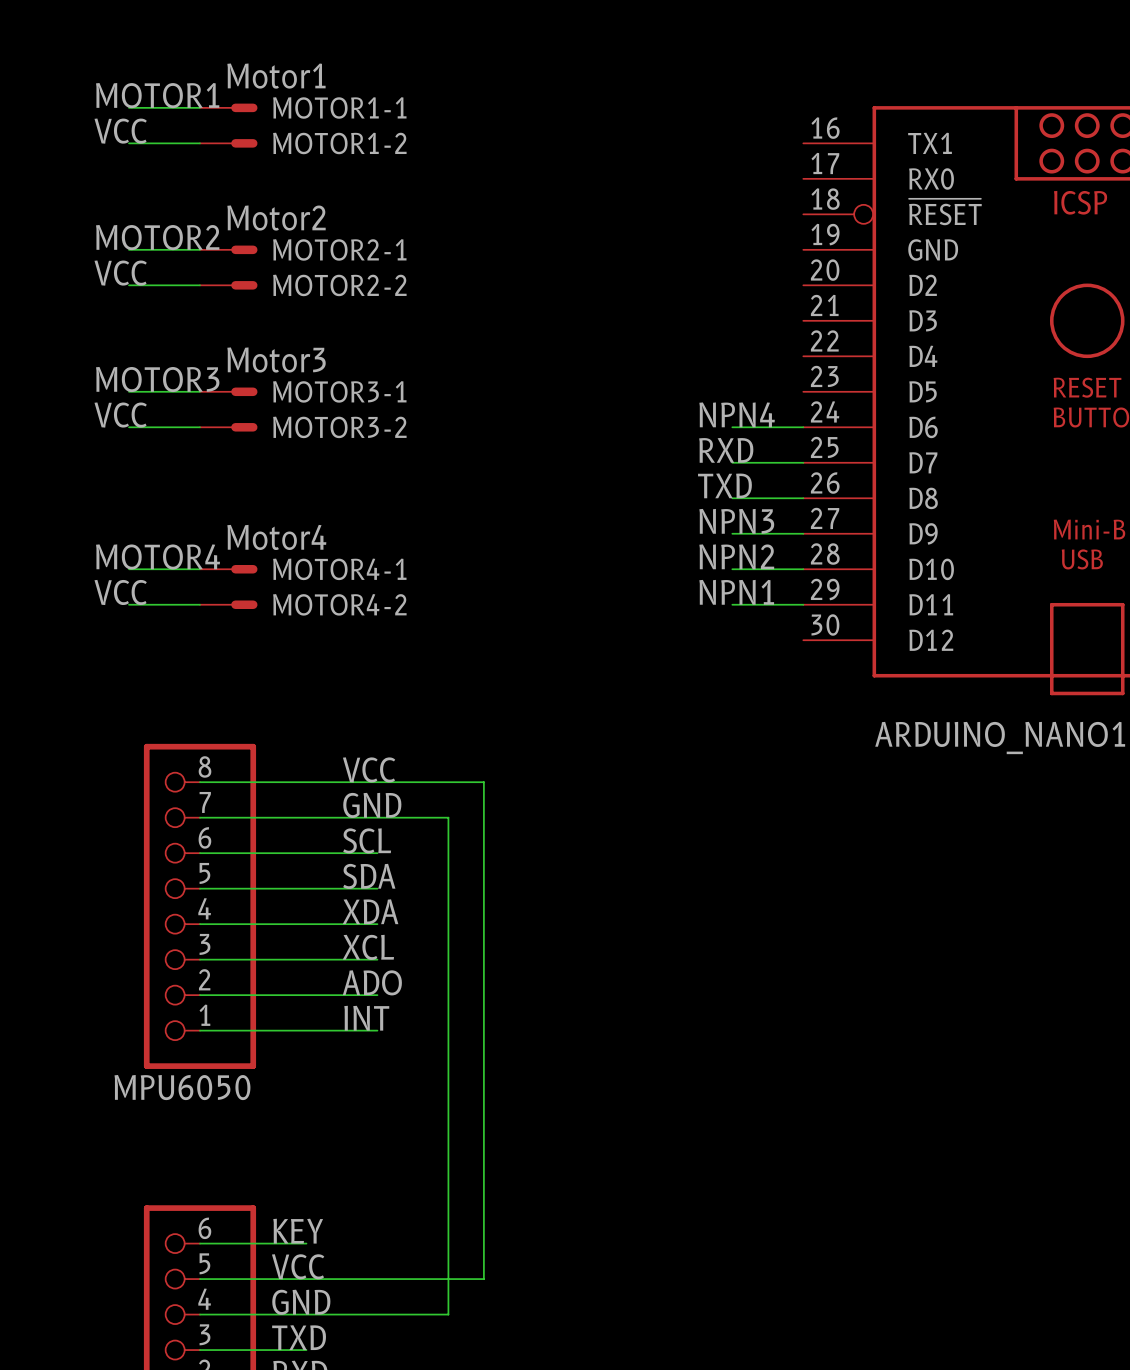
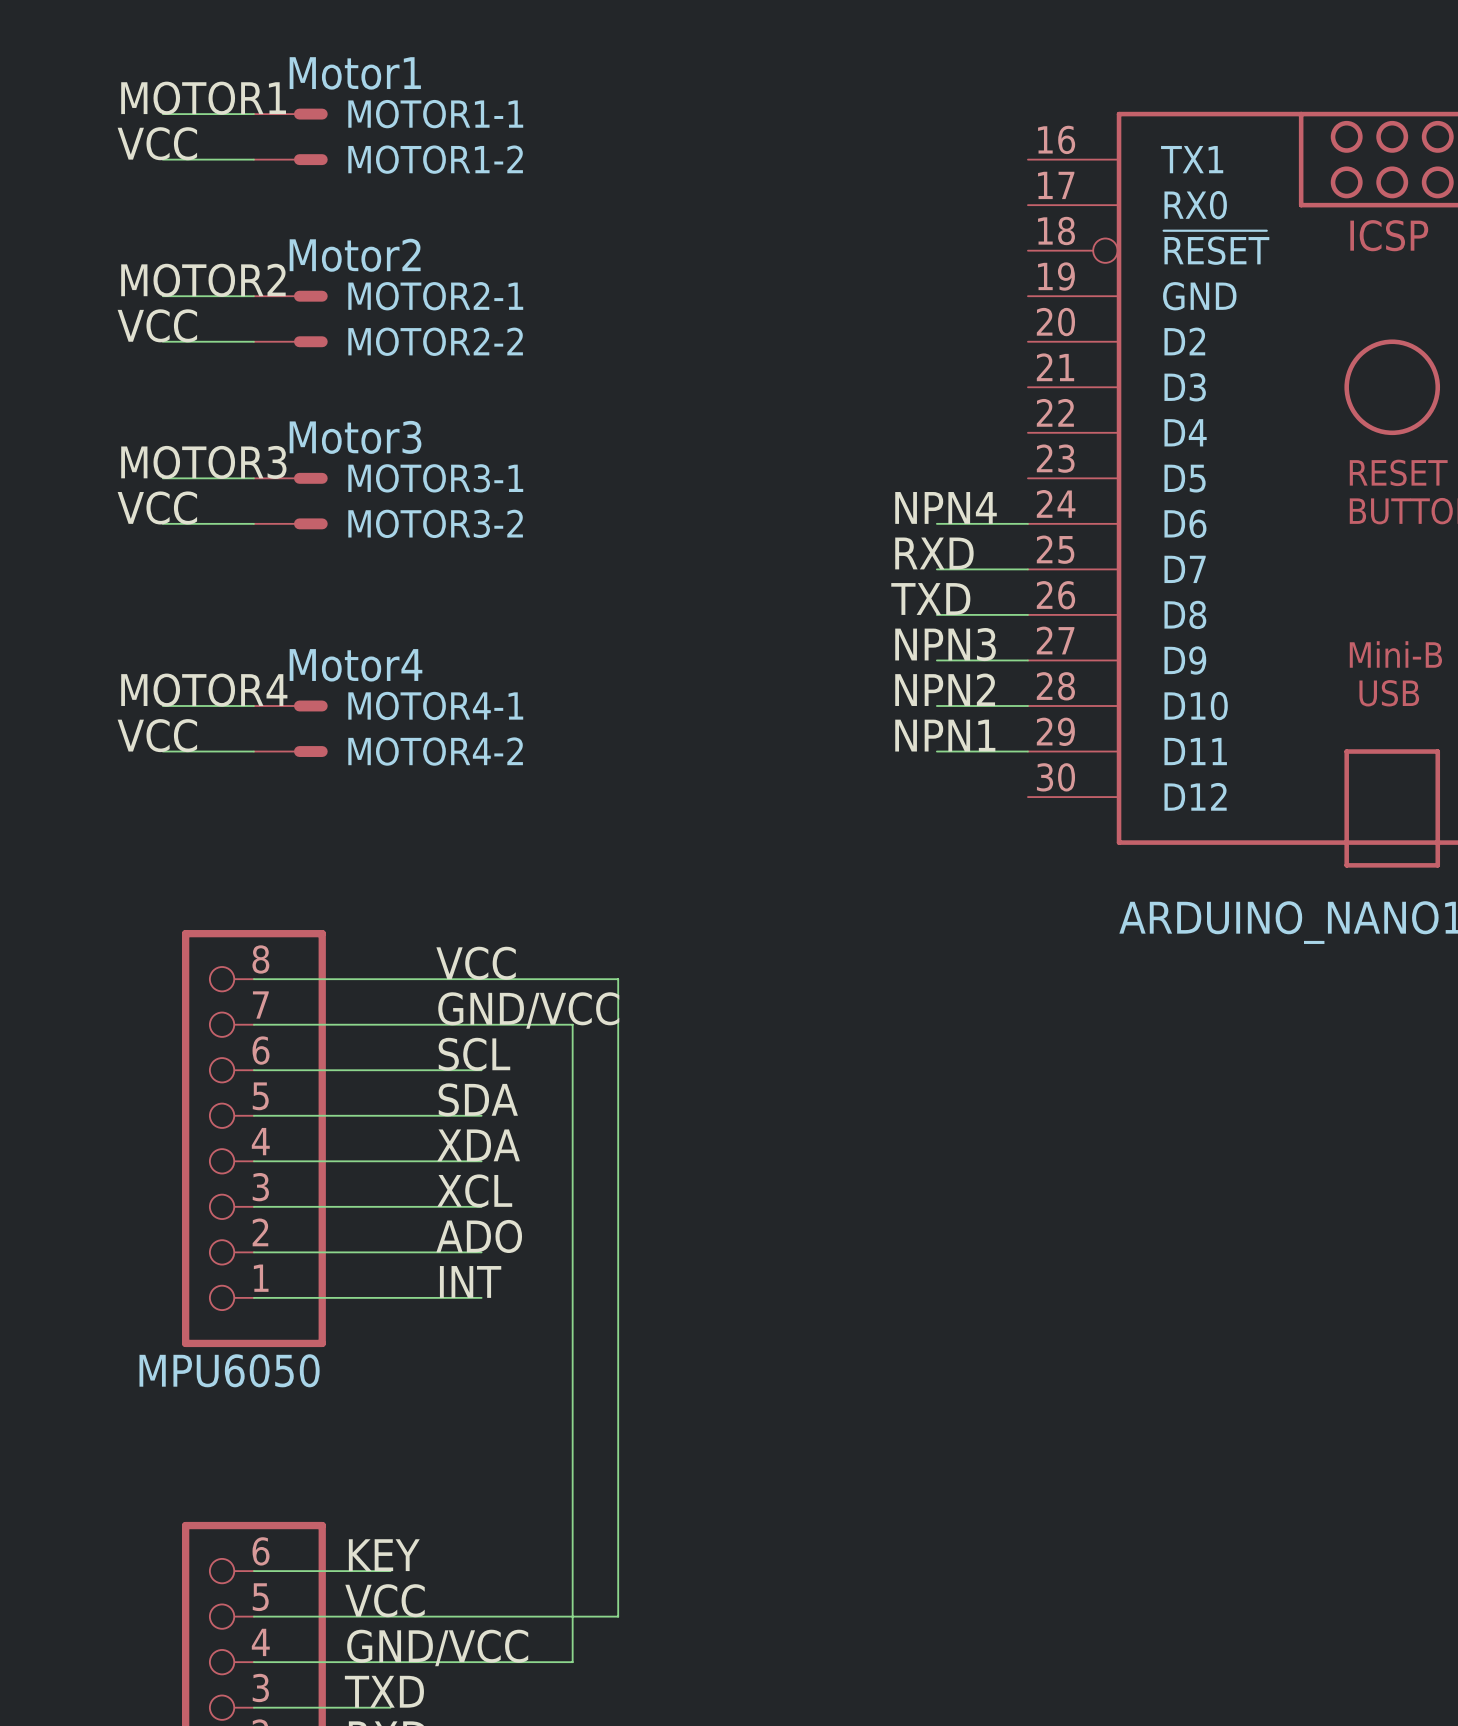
label: GND (372, 805) -> GND/VCC (528, 1010)
label: GND (301, 1302) -> GND/VCC (437, 1647)

